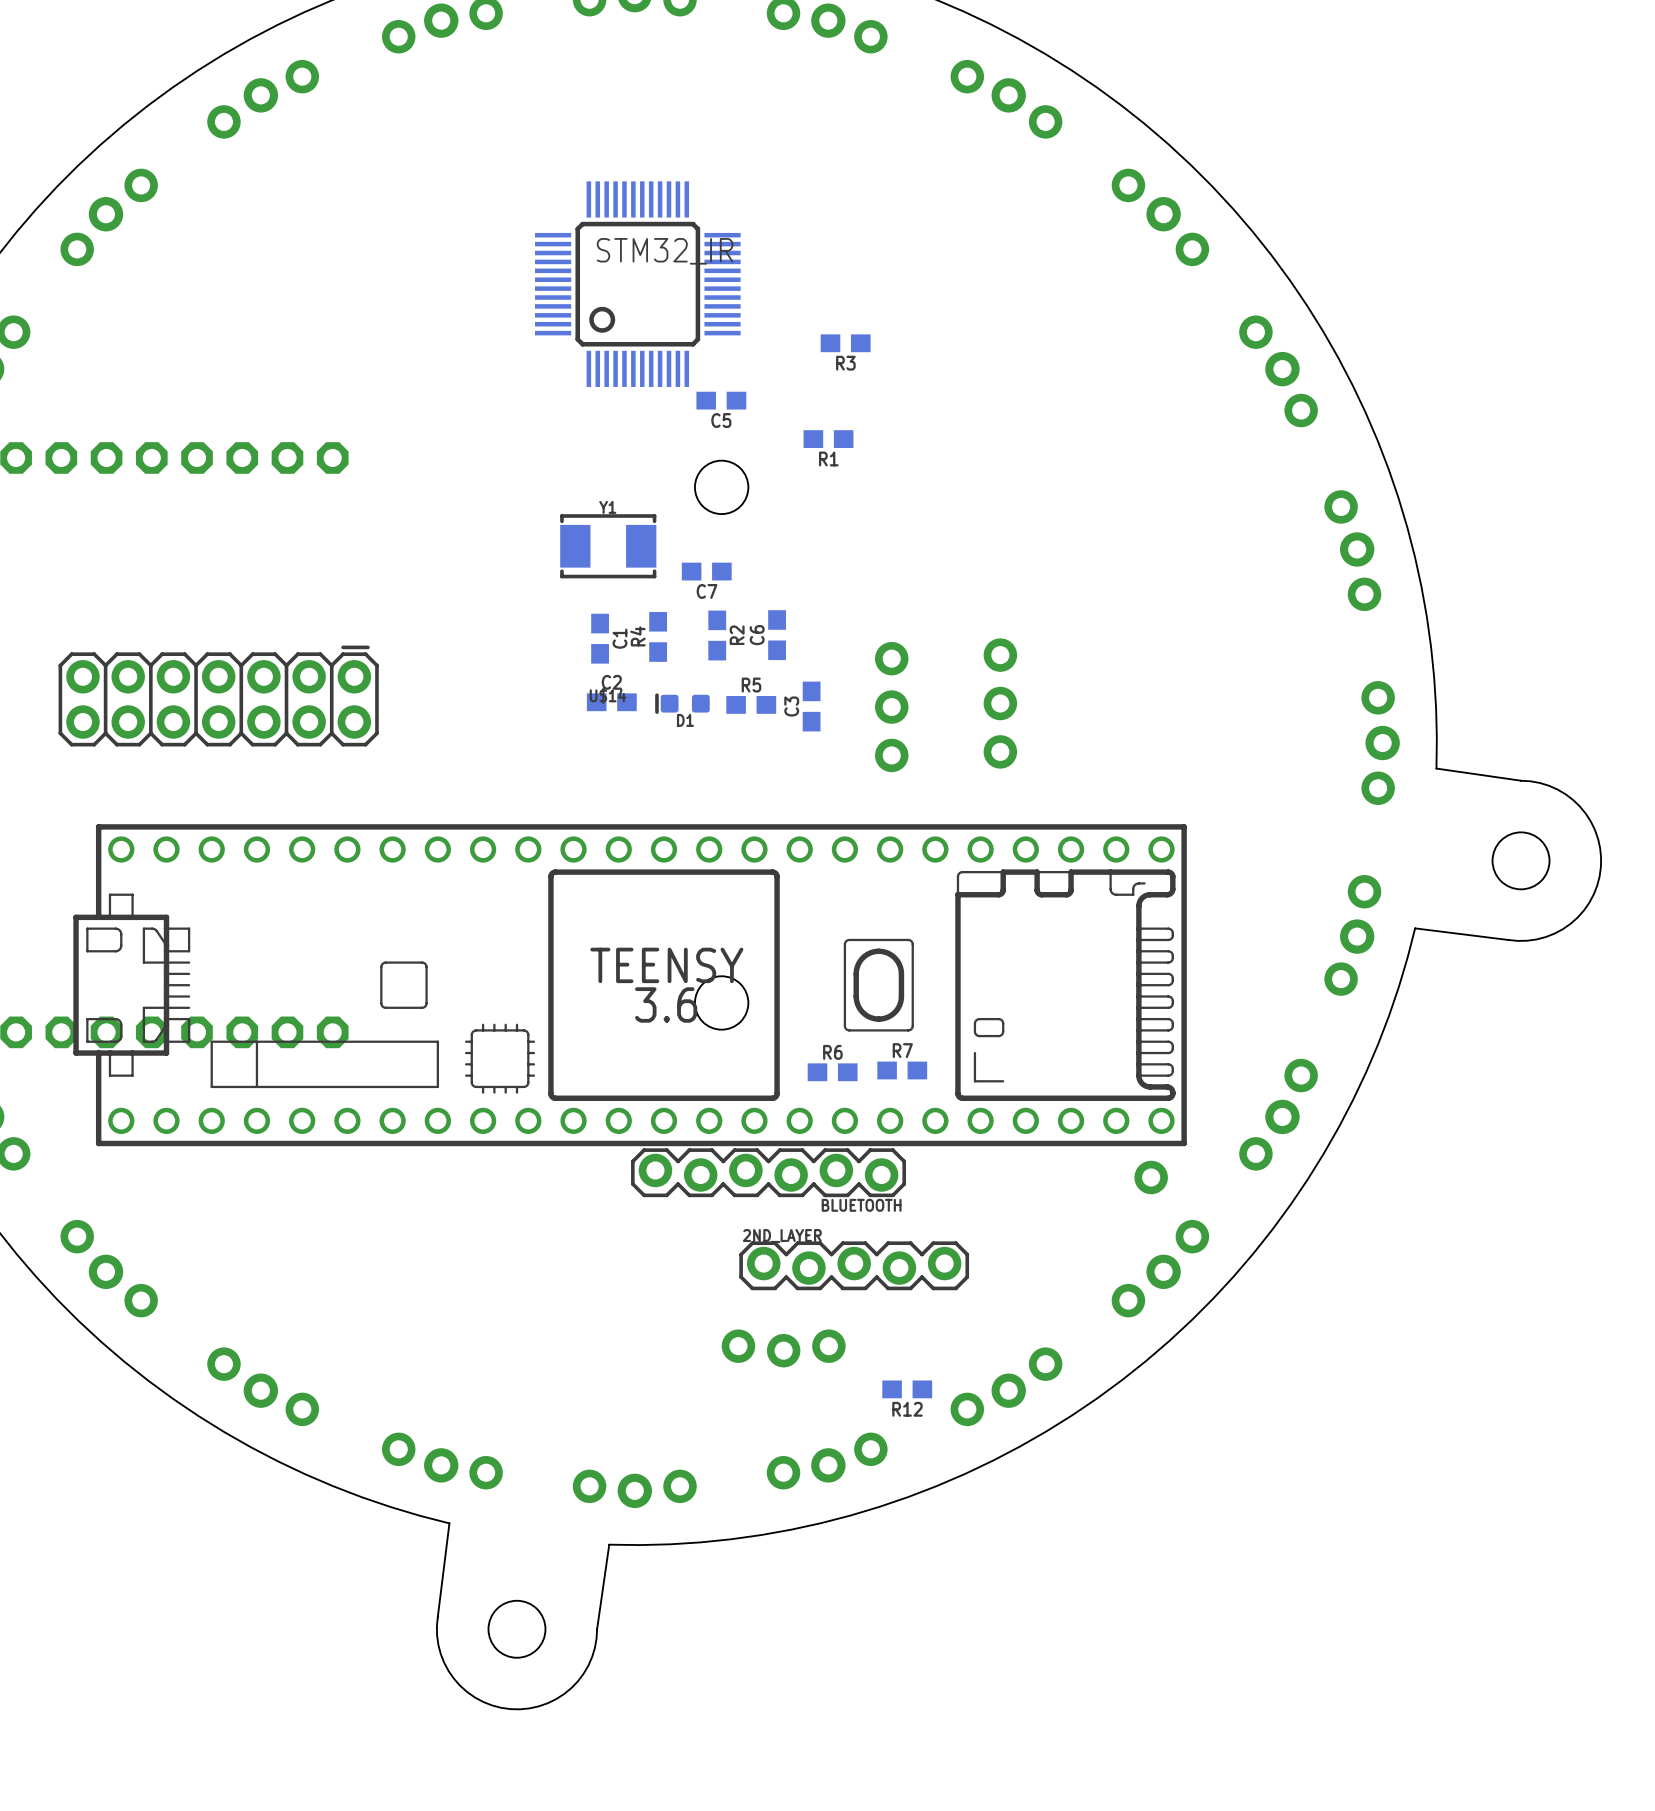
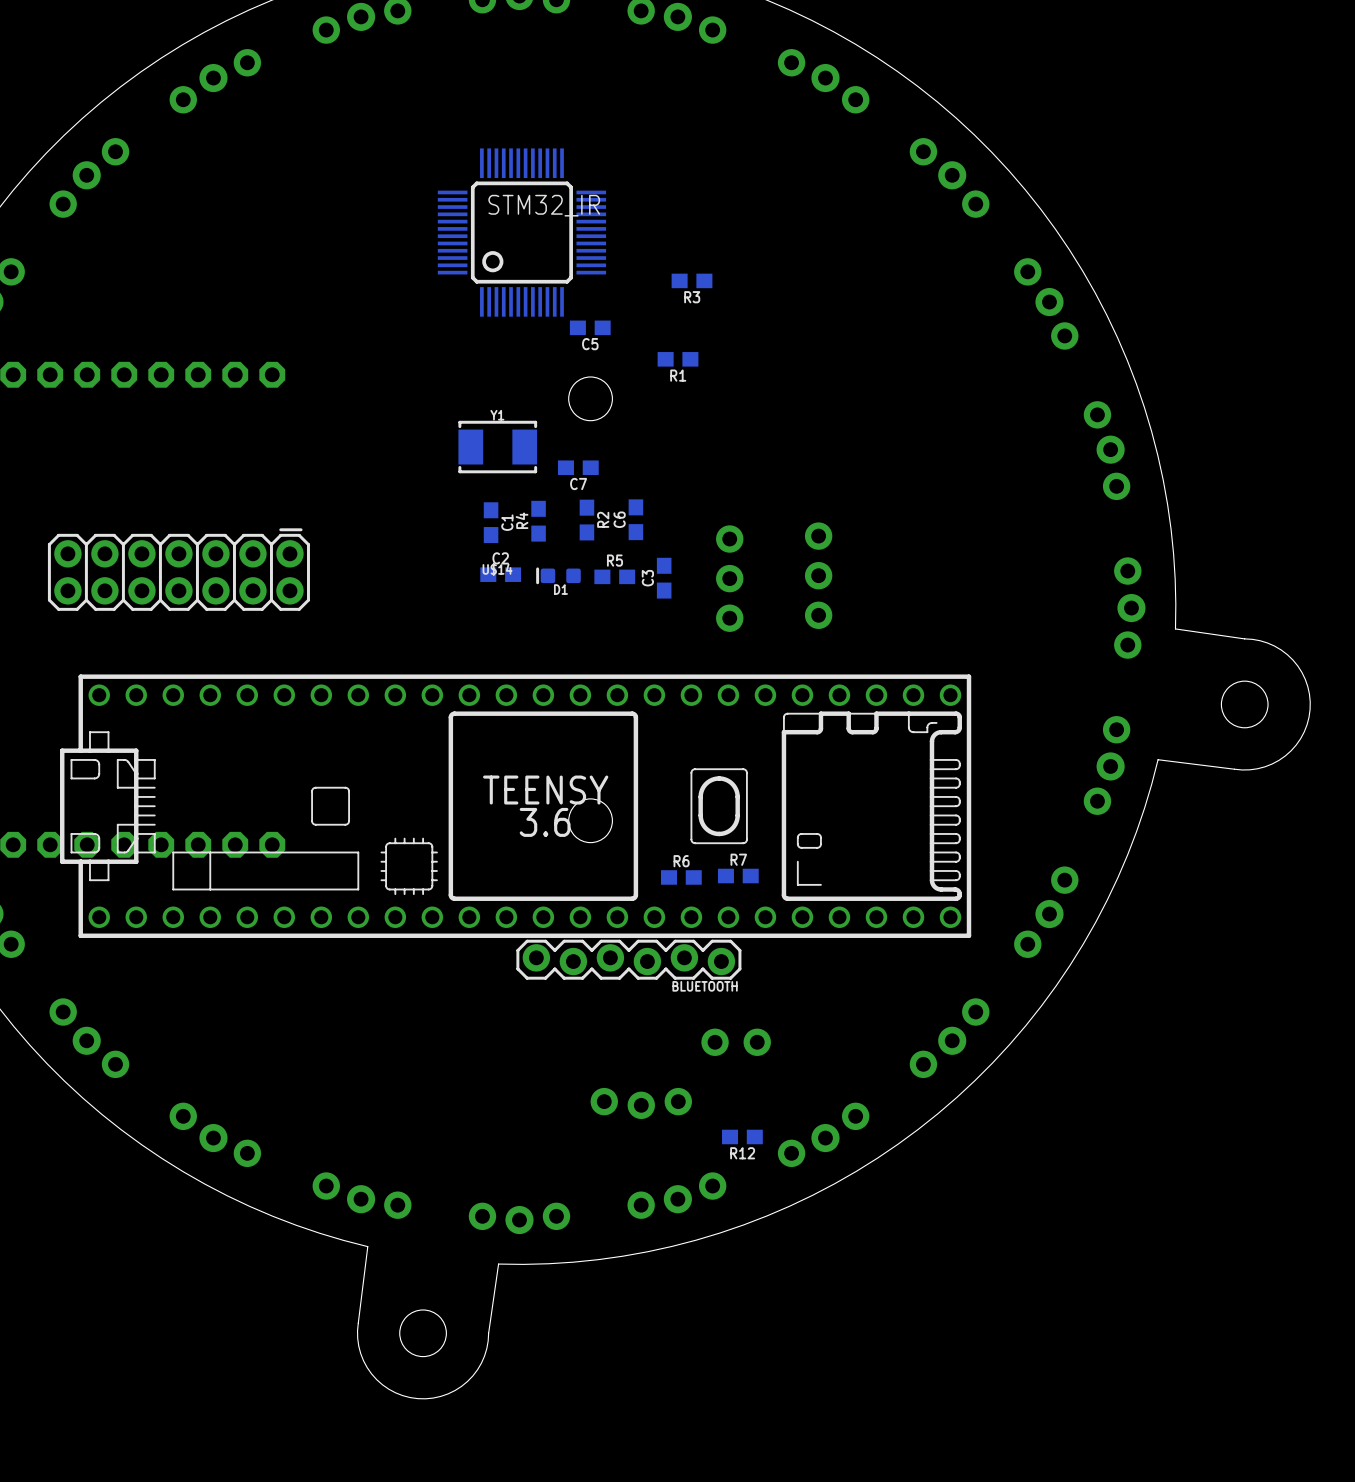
part: (1151, 1177) -> none
2ND_LAYER: (854, 1265) -> none
part: none -> (736, 1042)

